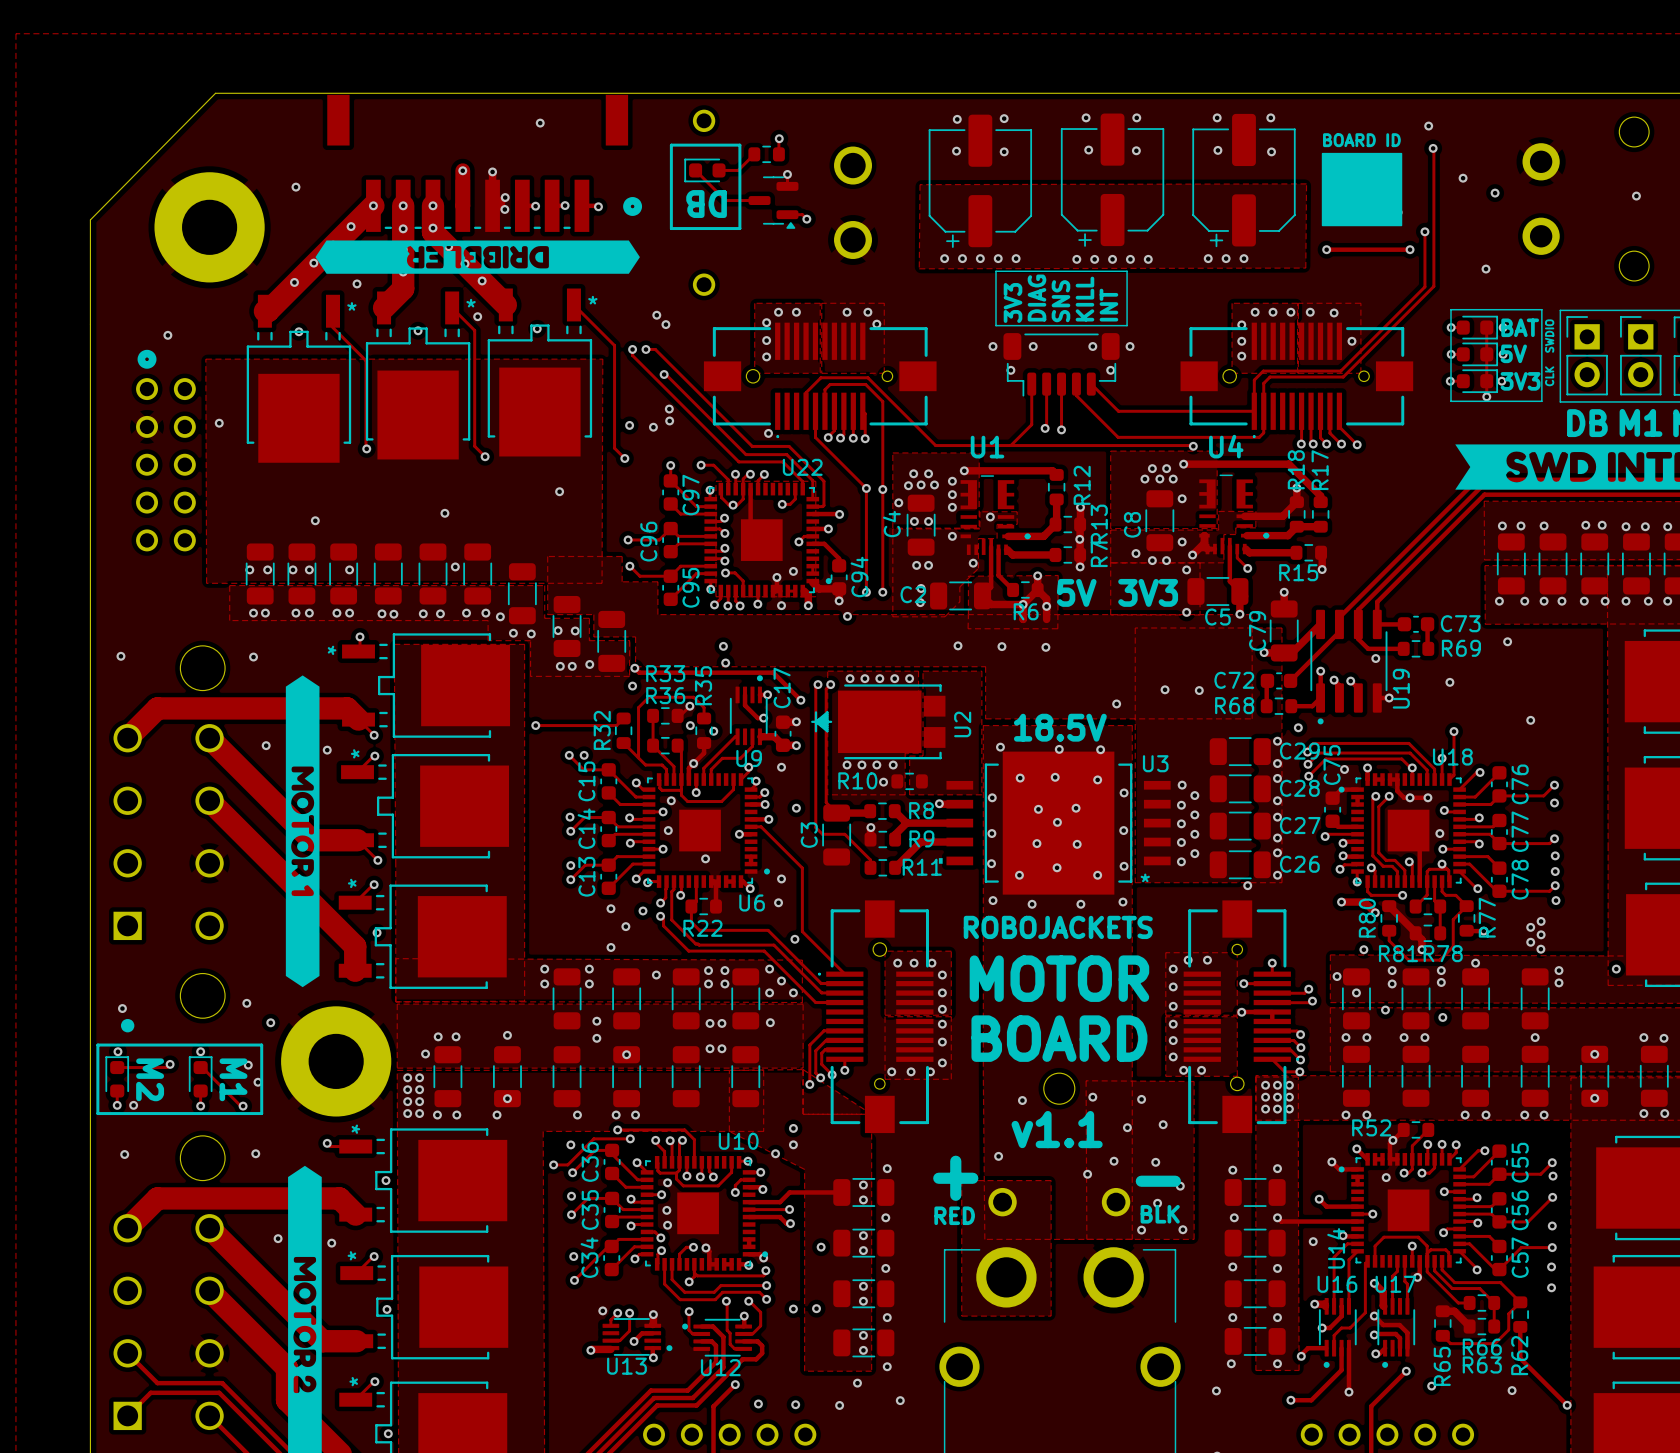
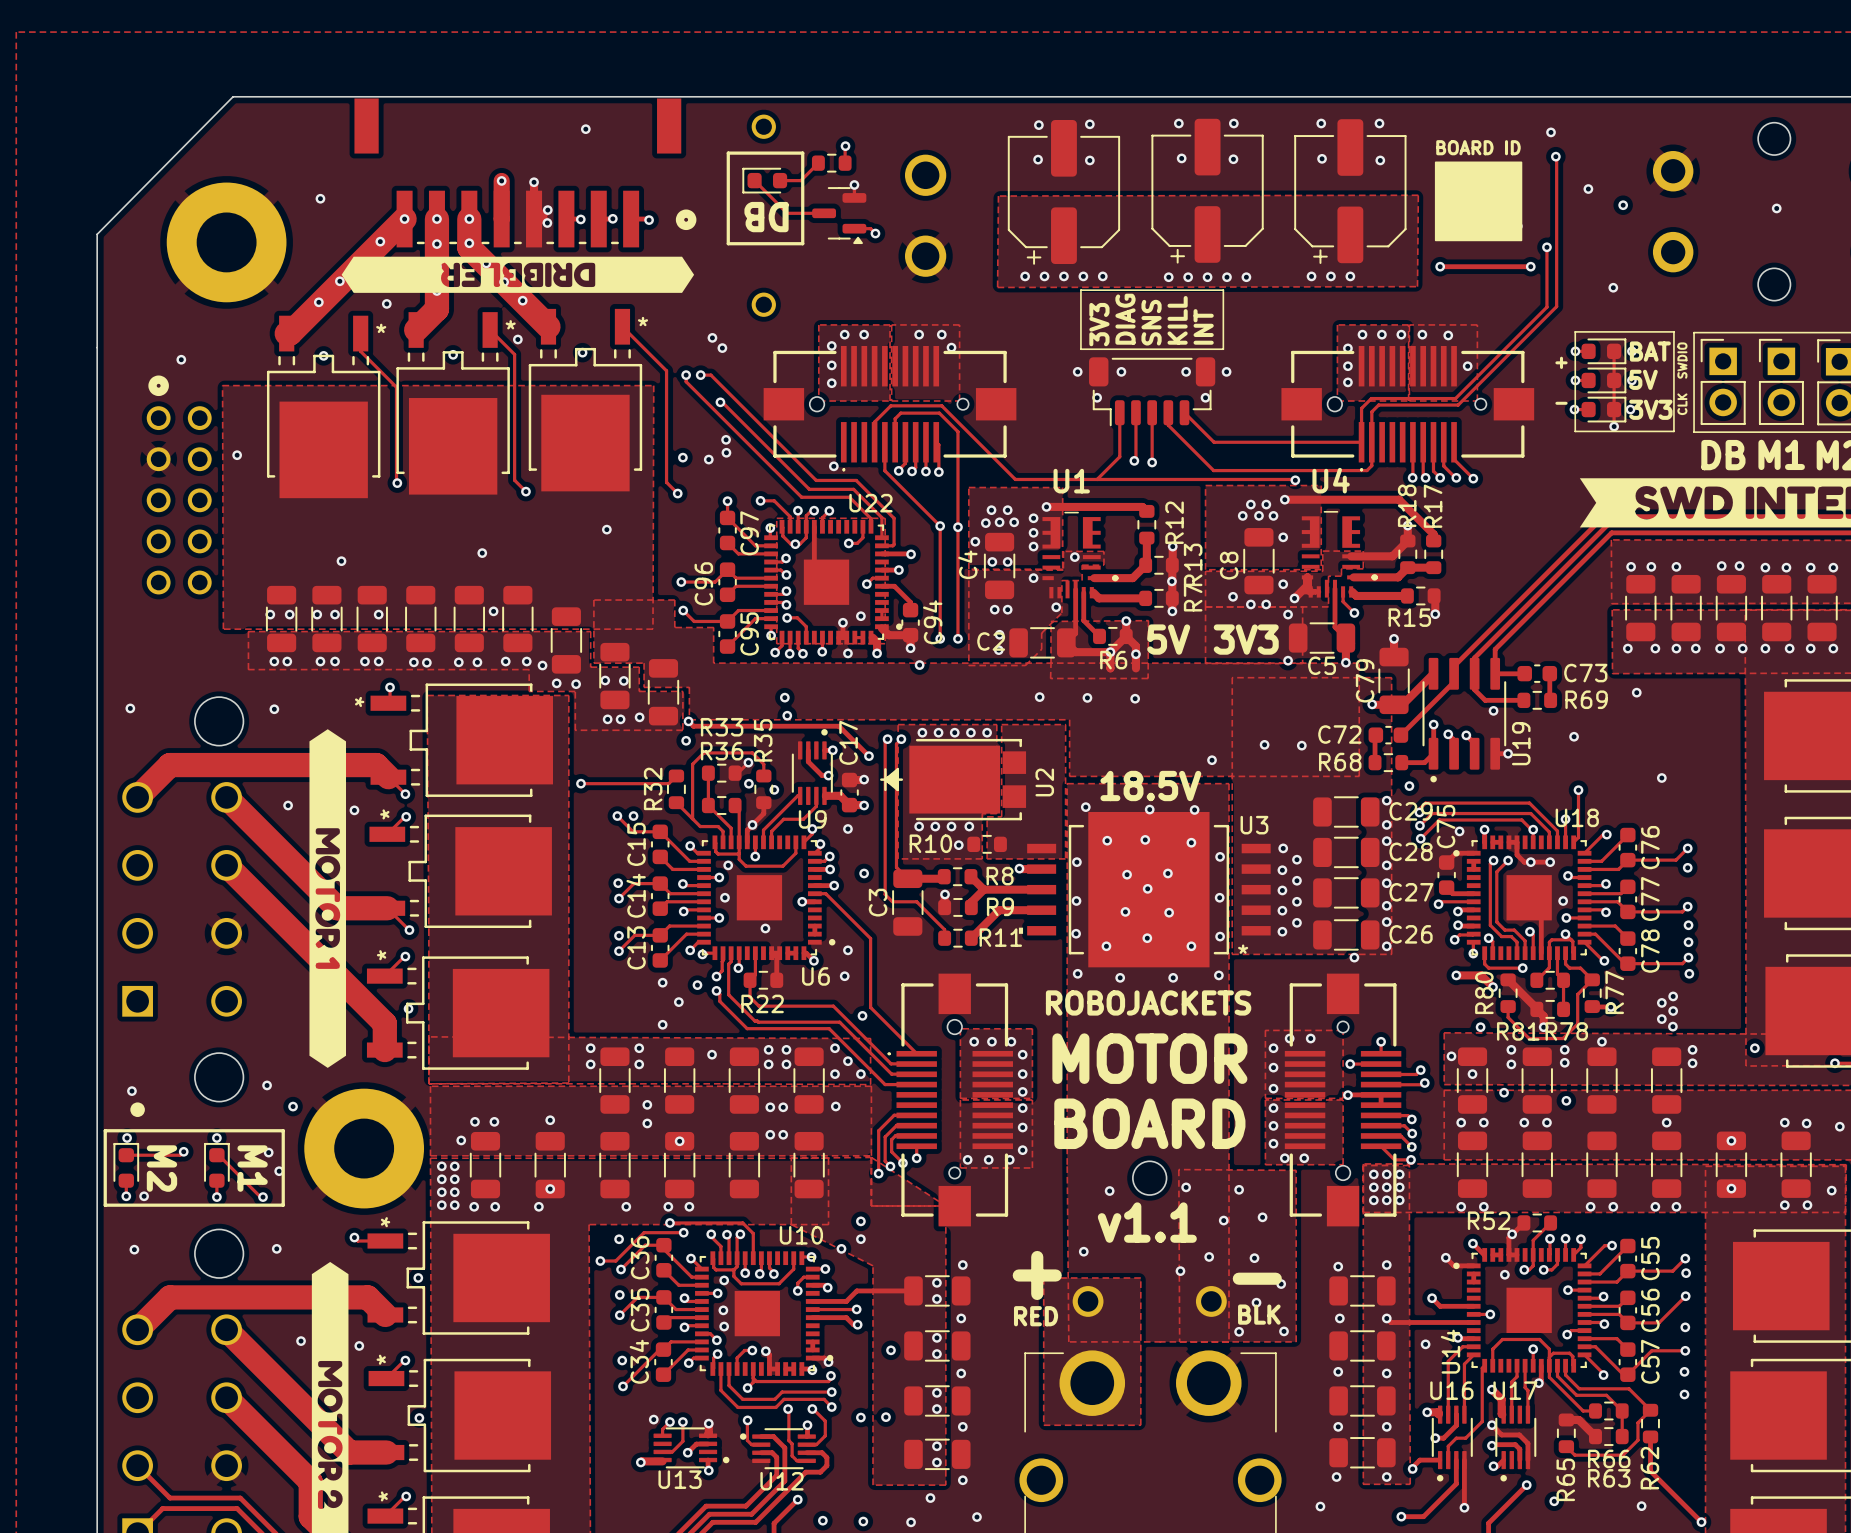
text: none -> + (1561, 362)
text: none -> - (1561, 403)

